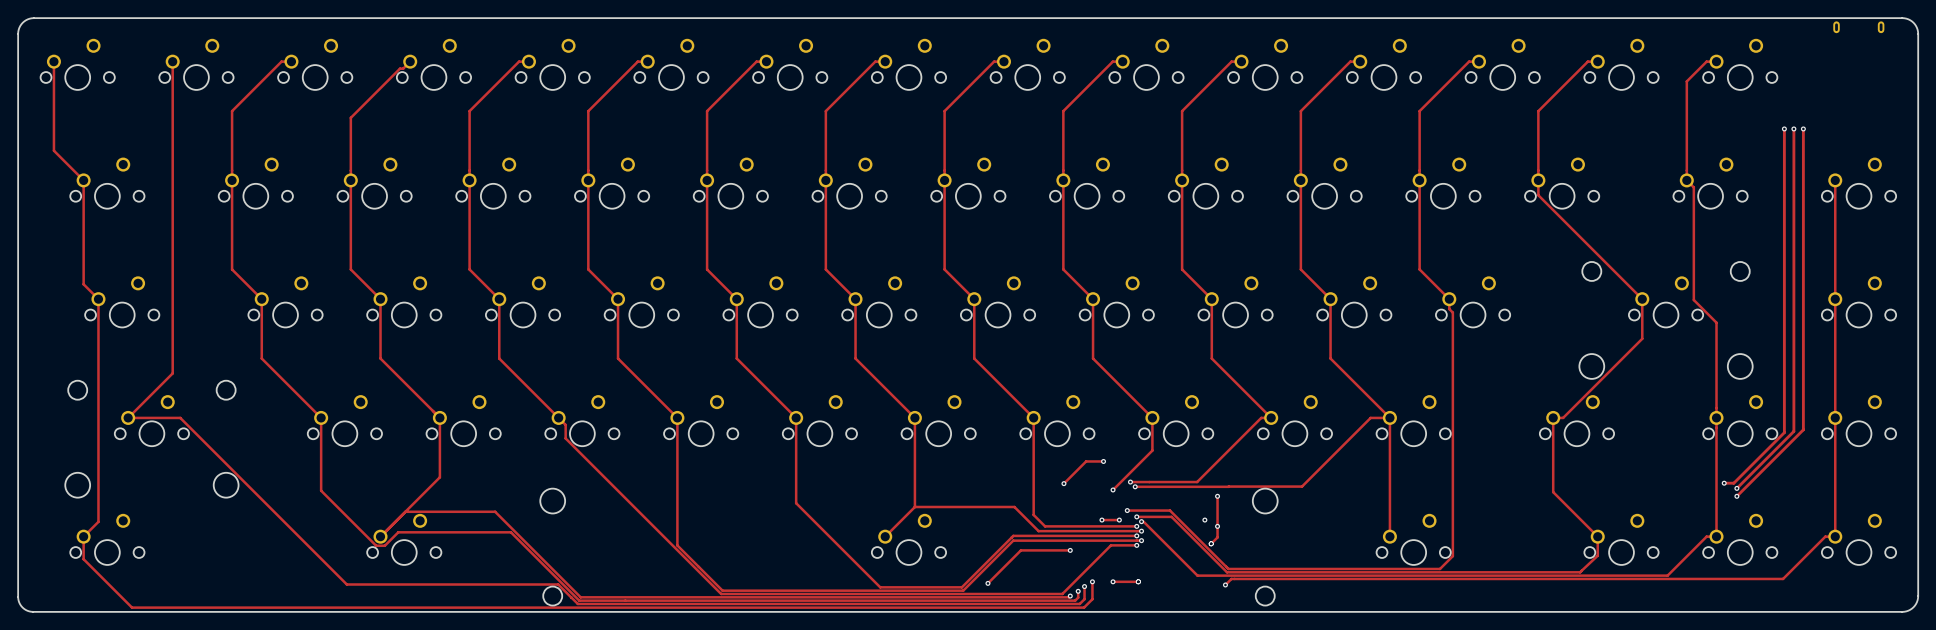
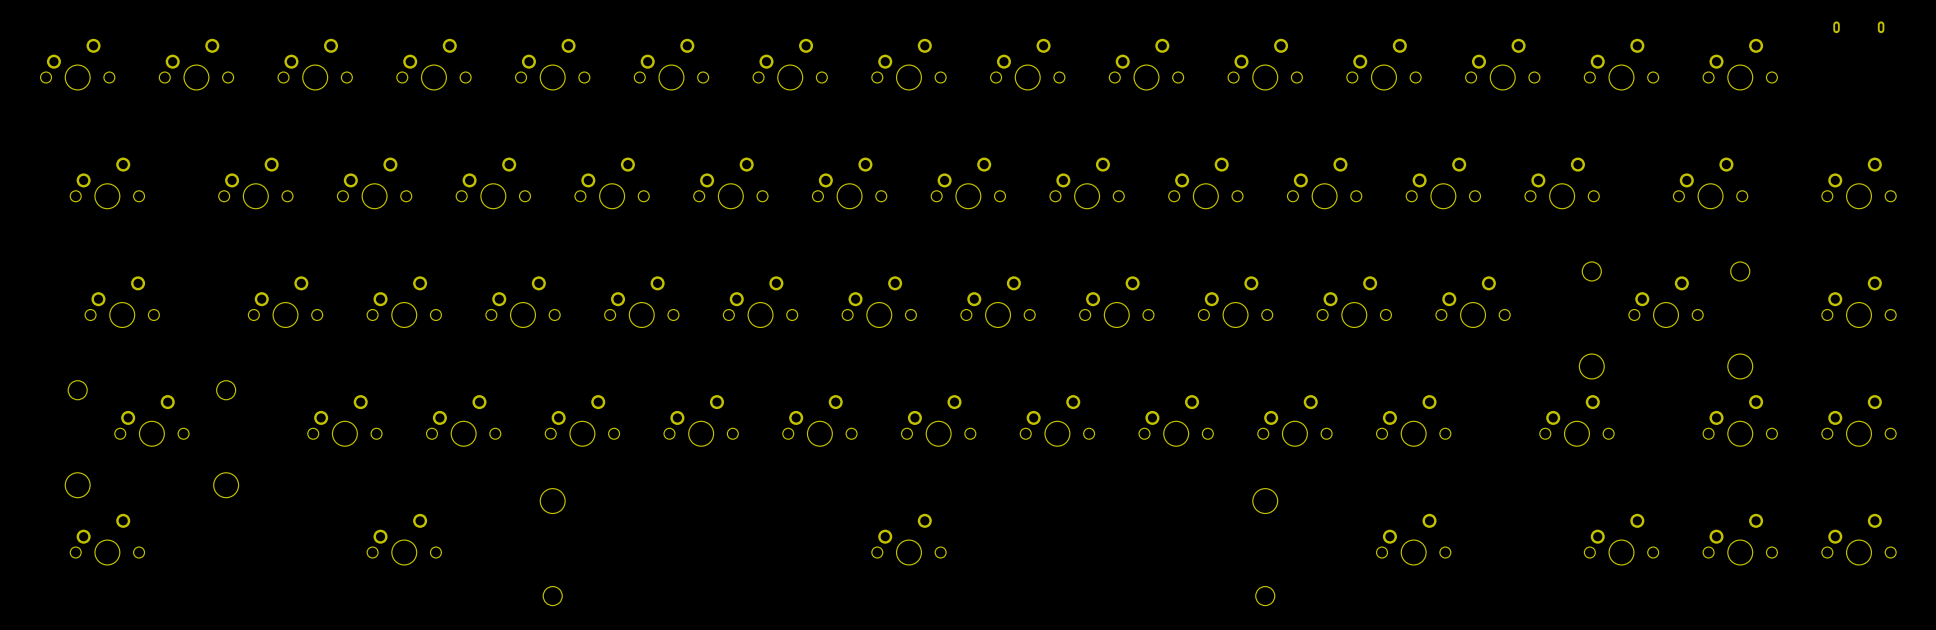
board edge: (33, 18) (1906, 18) (1914, 24) (1918, 33) (1917, 600) (1911, 608) (1902, 611) (29, 611) (21, 606) (18, 596) (18, 33) (22, 22) (33, 18) -> none
track: (53, 61) (53, 150) (83, 180) (83, 284) (96, 297) -> none
track: (172, 61) (172, 373) (128, 417) (180, 417) (346, 584) (558, 584) (571, 597) -> none
track: (291, 61) (281, 61) (232, 111) (232, 269) (261, 299) (261, 358) (321, 417) (321, 490) (376, 545) (384, 545) (398, 532) (510, 532) (579, 600) (1075, 600) (1078, 597) (1078, 591) -> none
track: (410, 61) (403, 68) (399, 68) (350, 117) (350, 269) (380, 299) (380, 358) (439, 417) (439, 477) (380, 536) -> none
track: (528, 61) (519, 61) (469, 111) (469, 269) (499, 299) (499, 358) (565, 424) (565, 438) (721, 594) (1062, 594) (1110, 545) (1136, 545) -> none
track: (647, 61) (637, 61) (588, 111) (588, 269) (618, 299) (618, 358) (677, 417) (677, 545) (722, 590) (963, 590) (1013, 540) (1141, 540) -> none
track: (766, 61) (756, 61) (707, 111) (707, 269) (736, 299) (736, 358) (796, 417) (796, 503) (880, 587) (961, 587) (1013, 535) (1136, 535) -> none
track: (885, 61) (875, 61) (825, 111) (825, 269) (855, 299) (855, 358) (914, 417) (914, 506) -> none
track: (1003, 61) (994, 61) (944, 111) (944, 269) (974, 299) (974, 358) (1033, 417) (1033, 514) (1045, 526) (1136, 526) -> none
track: (1122, 61) (1112, 61) (1063, 111) (1063, 269) (1093, 299) (1093, 358) (1152, 417) (1152, 450) (1113, 489) -> none
track: (1241, 61) (1231, 61) (1182, 111) (1182, 269) (1211, 299) (1211, 358) (1271, 417) (1261, 417) (1197, 482) (1130, 482) -> none
track: (1360, 61) (1350, 61) (1300, 111) (1300, 269) (1330, 299) (1330, 358) (1389, 417) -> none
track: (1479, 61) (1469, 61) (1419, 111) (1419, 269) (1449, 299) (1449, 309) (1452, 312) (1452, 556) (1440, 568) (1228, 568) (1226, 567) -> none
track: (1597, 61) (1587, 61) (1538, 111) (1538, 195) (1642, 299) (1642, 338) (1563, 417) (1553, 417) (1553, 492) (1597, 536) (1597, 555) (1580, 572) (1227, 572) (1171, 516) (1136, 516) -> none
track: (1716, 61) (1706, 61) (1686, 81) (1686, 180) (1693, 187) (1693, 300) (1716, 322) (1716, 536) (1706, 536) (1667, 575) (1197, 575) (1143, 521) -> none
track: (1784, 128) (1784, 432) (1733, 483) (1724, 483) -> none
via: (1784, 128) -> none
track: (1793, 128) (1793, 431) (1736, 488) -> none
via: (1793, 128) -> none
track: (1803, 128) (1803, 429) (1736, 496) -> none
via: (1803, 128) -> none
track: (1835, 180) (1835, 536) (1825, 536) (1783, 578) (1231, 578) (1225, 584) -> none
track: (98, 299) (98, 521) (83, 536) (83, 559) (132, 607) (1084, 607) (1092, 599) (1092, 581) -> none
track: (1389, 417) (1370, 417) (1302, 486) (1135, 486) -> none
track: (1389, 417) (1389, 536) -> none
track: (1103, 461) (1086, 461) (1063, 483) -> none
via: (1103, 461) -> none
via: (1130, 482) -> none
via: (1063, 483) -> none
via: (1724, 483) -> none
via: (1135, 486) -> none
via: (1736, 488) -> none
via: (1113, 489) -> none
track: (1217, 496) (1217, 537) (1211, 543) -> none
via: (1217, 496) -> none
via: (1736, 496) -> none
track: (914, 506) (885, 536) -> none
track: (914, 506) (1014, 506) (1038, 531) (1141, 531) -> none
track: (1127, 510) (1169, 510) (1226, 567) -> none
via: (1127, 510) -> none
track: (405, 511) (495, 511) (580, 597) (1070, 596) -> none
via: (1136, 516) -> none
track: (1101, 520) (1119, 520) -> none
via: (1101, 520) -> none
via: (1119, 520) -> none
via: (1204, 520) -> none
via: (1141, 521) -> none
via: (1136, 526) -> none
via: (1217, 526) -> none
via: (1141, 531) -> none
via: (1136, 535) -> none
via: (1141, 540) -> none
via: (1211, 543) -> none
via: (1136, 545) -> none
track: (1070, 550) (1020, 550) (987, 583) -> none
via: (1070, 550) -> none
via: (1092, 581) -> none
track: (1113, 581) (1138, 581) -> none
via: (1113, 581) -> none
via: (1138, 581) -> none
via: (987, 583) -> none
via: (1225, 584) -> none
track: (1084, 586) (1084, 599) (1079, 603) (577, 603) (571, 597) -> none
via: (1084, 586) -> none
via: (1078, 591) -> none
via: (1070, 596) -> none

